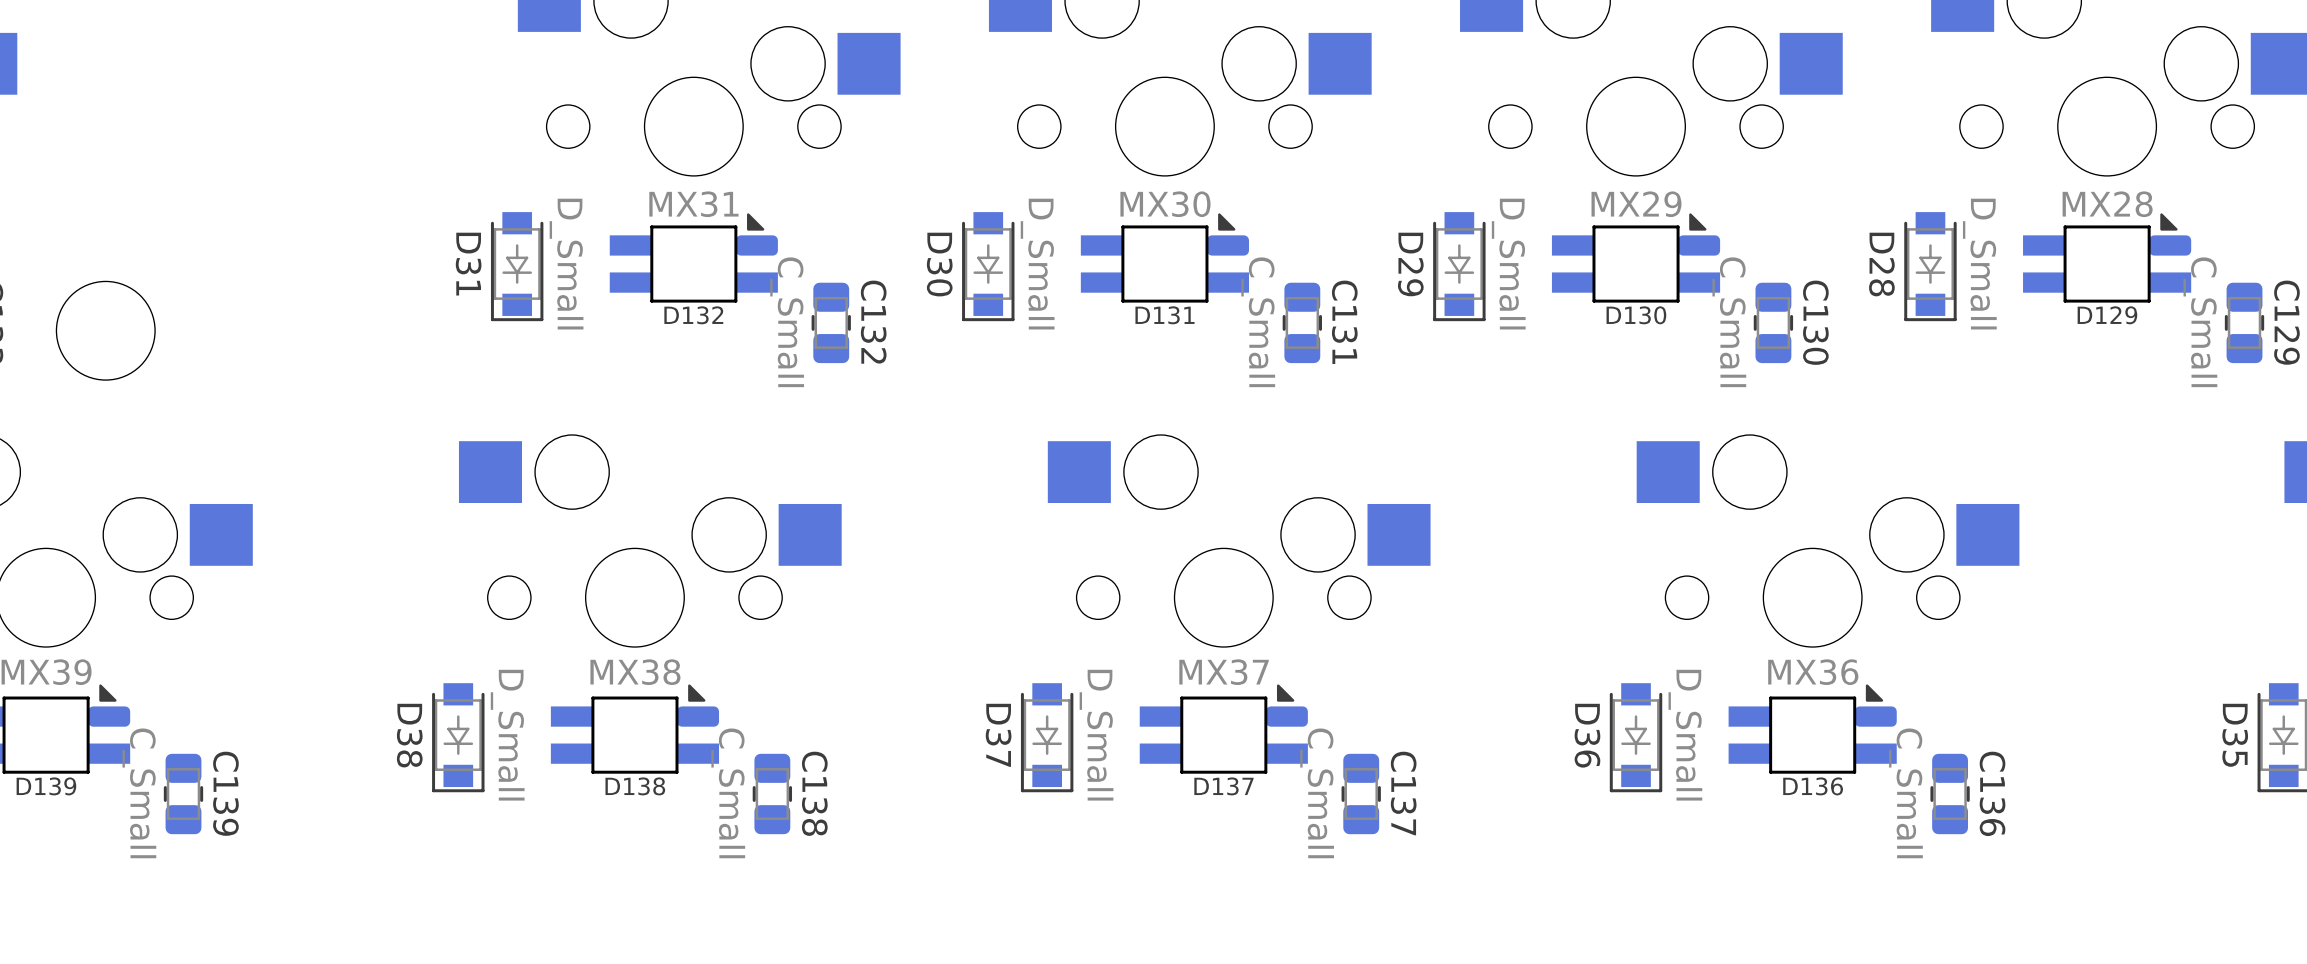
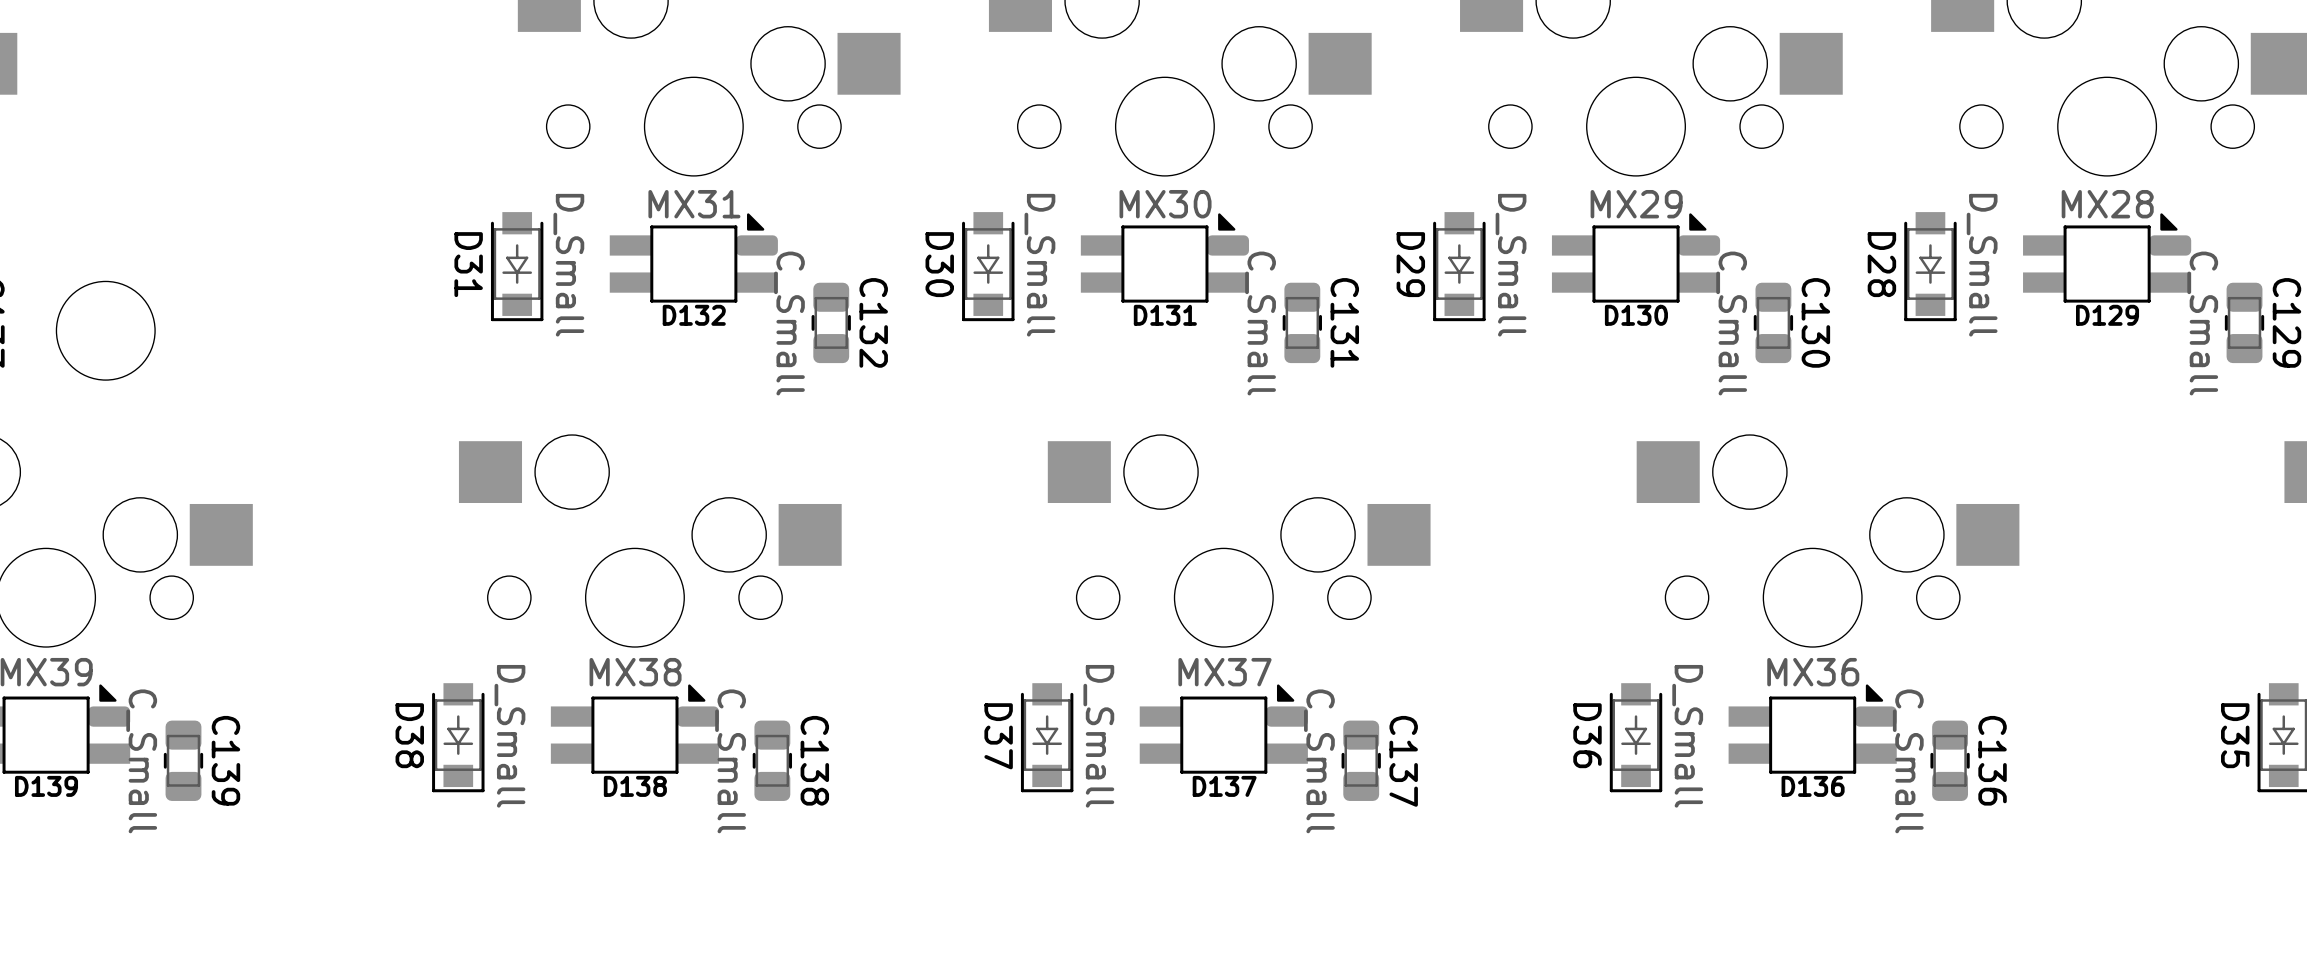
C139 position: (183, 793) -> (183, 760)
C138 position: (772, 793) -> (772, 760)
C137 position: (1361, 793) -> (1361, 760)
C136 position: (1950, 793) -> (1950, 760)

